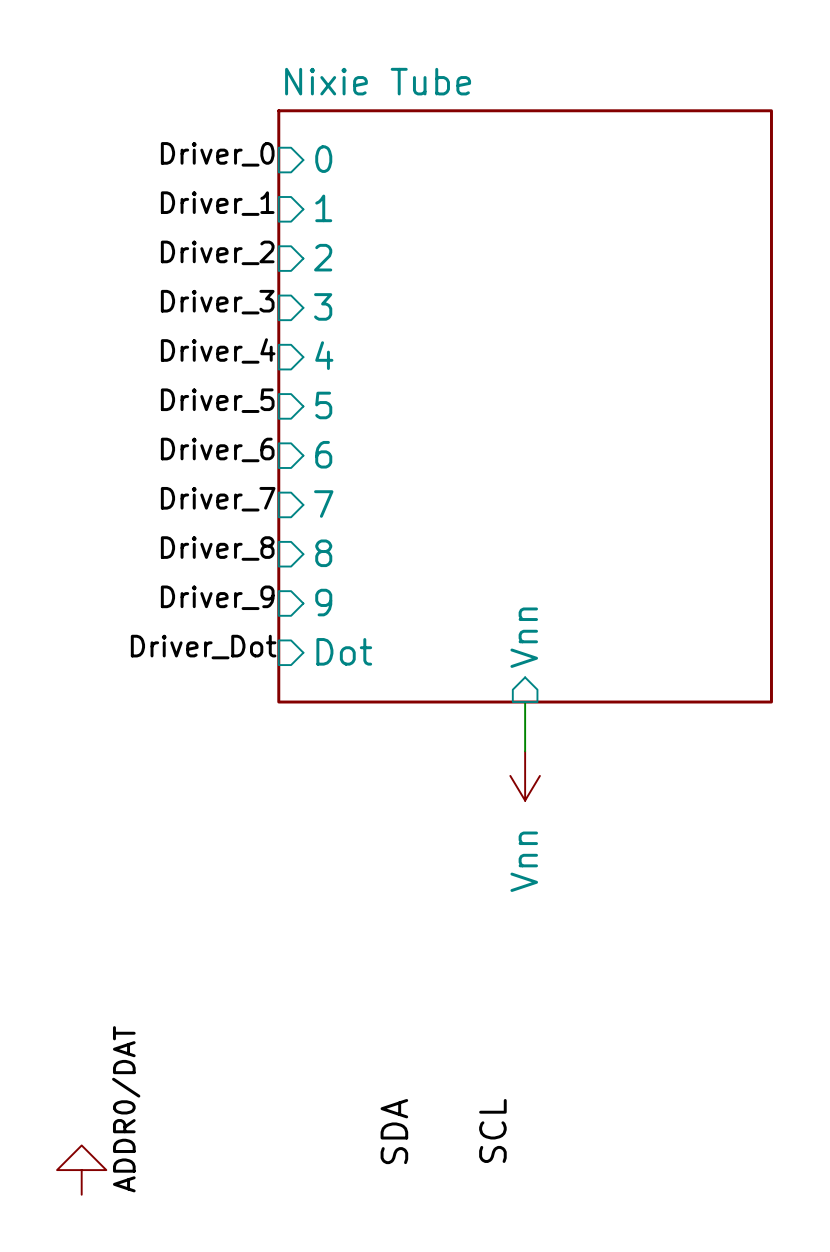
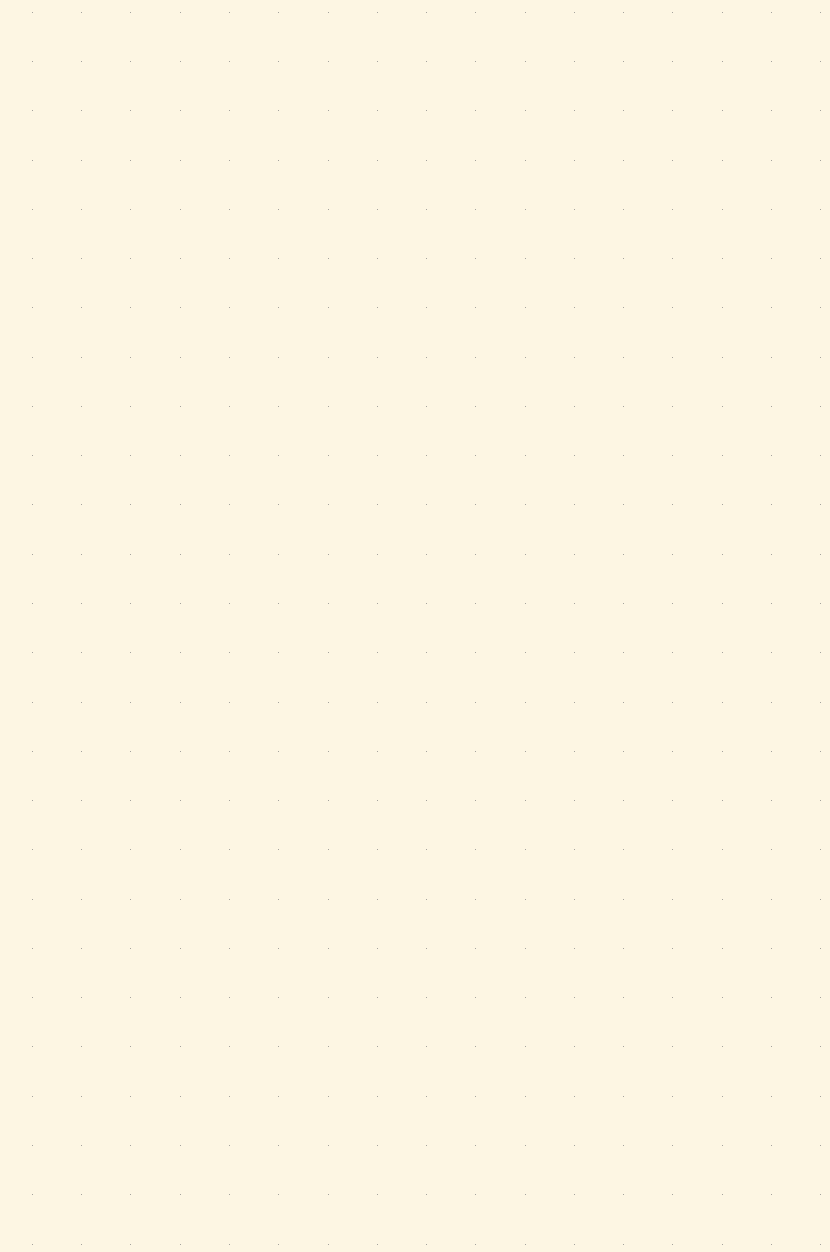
label: Driver_0 (217, 154) -> none
sheet pin: 0 (323, 159) -> none
label: Driver_1 (217, 203) -> none
sheet pin: 1 (323, 208) -> none
label: Driver_2 (217, 252) -> none
sheet pin: 2 (323, 257) -> none
label: Driver_3 (217, 302) -> none
sheet pin: 3 (323, 306) -> none
label: Driver_4 (218, 350) -> none
sheet pin: 4 (324, 355) -> none
label: Driver_5 (217, 400) -> none
sheet pin: 5 (323, 405) -> none
sheet Nixie Tube: (525, 406) -> none
label: Driver_6 (217, 449) -> none
sheet pin: 6 (323, 454) -> none
label: Driver_7 (218, 499) -> none
sheet pin: 7 (323, 504) -> none
label: Driver_8 (217, 548) -> none
sheet pin: 8 (323, 553) -> none
label: Driver_9 (217, 597) -> none
sheet pin: 9 (323, 602) -> none
sheet pin: Vnn (524, 637) -> none
label: Driver_Dot (203, 647) -> none
sheet pin: Dot (344, 651) -> none
wire: (525, 702) (525, 751) -> none
power symbol: Vnn (525, 775) -> none
label: ADDR0/DAT (126, 1109) -> none
label: SCL (492, 1130) -> none
label: SDA (394, 1131) -> none
power symbol: (81, 1170) -> none

